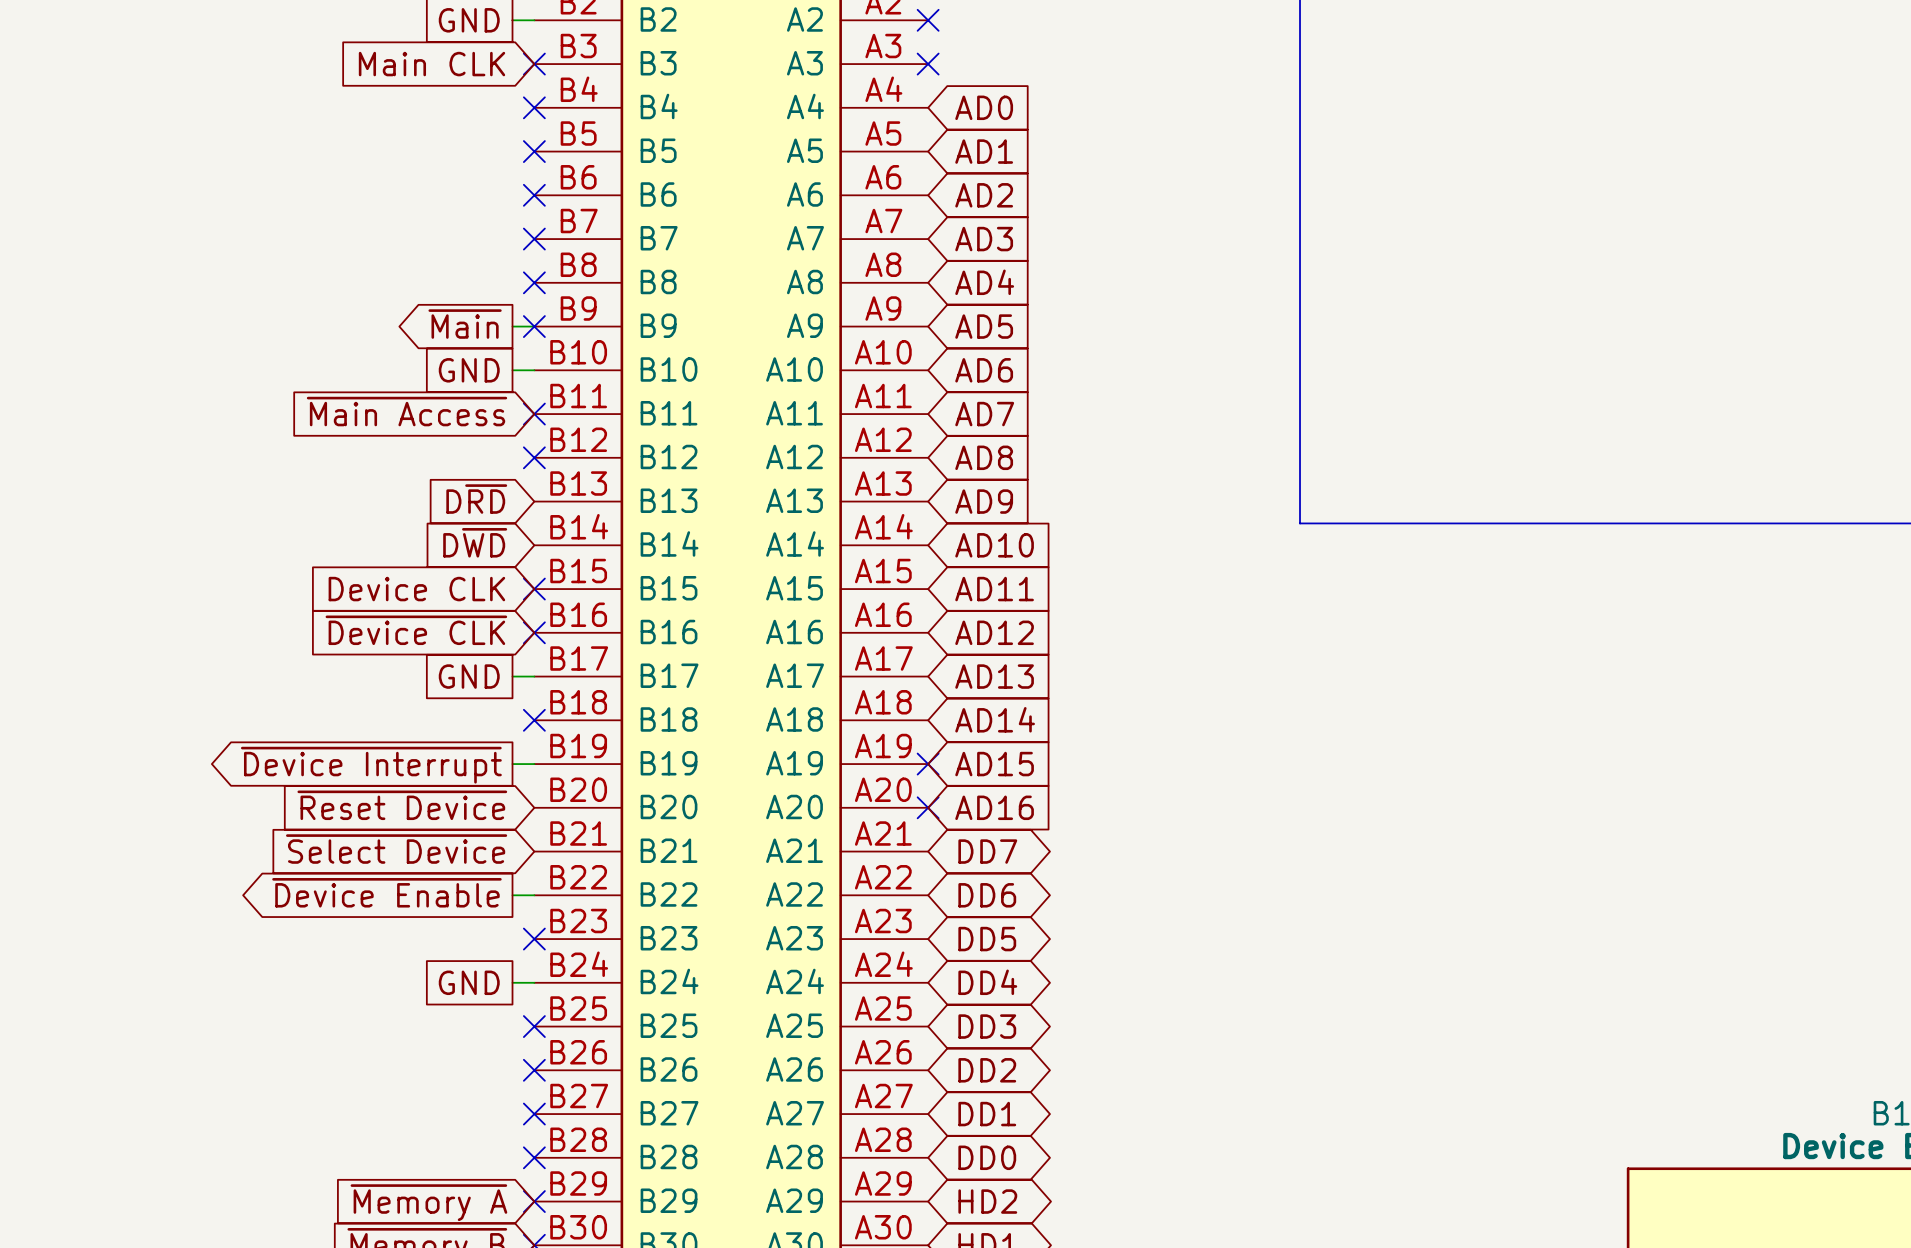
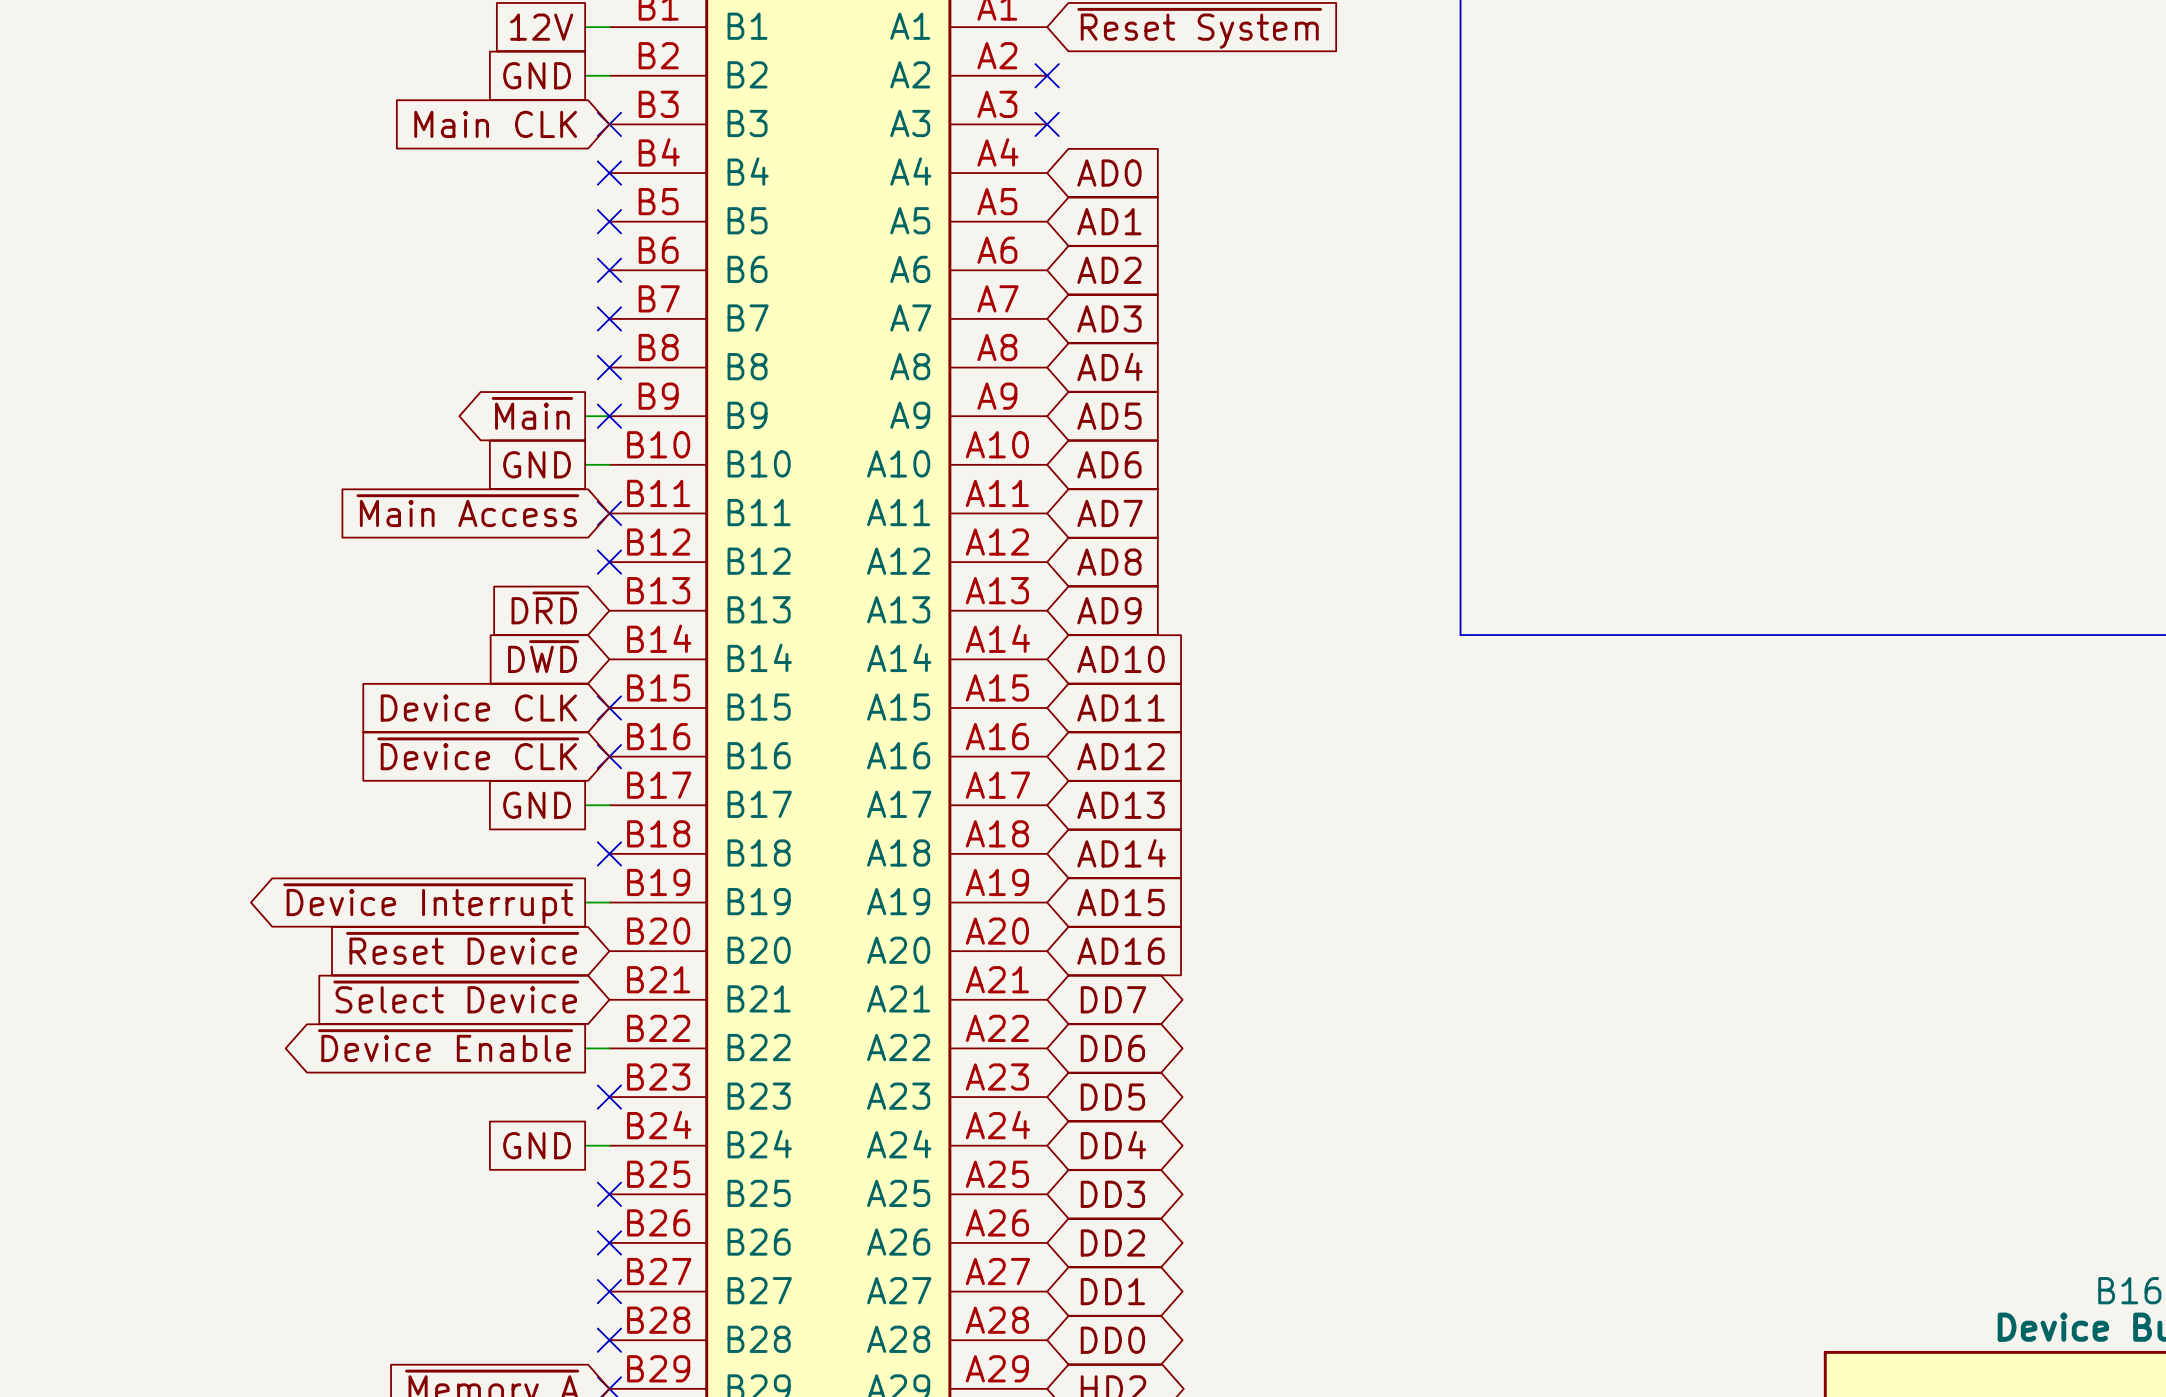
no-connect mark: (928, 764) -> none
no-connect mark: (928, 807) -> none

